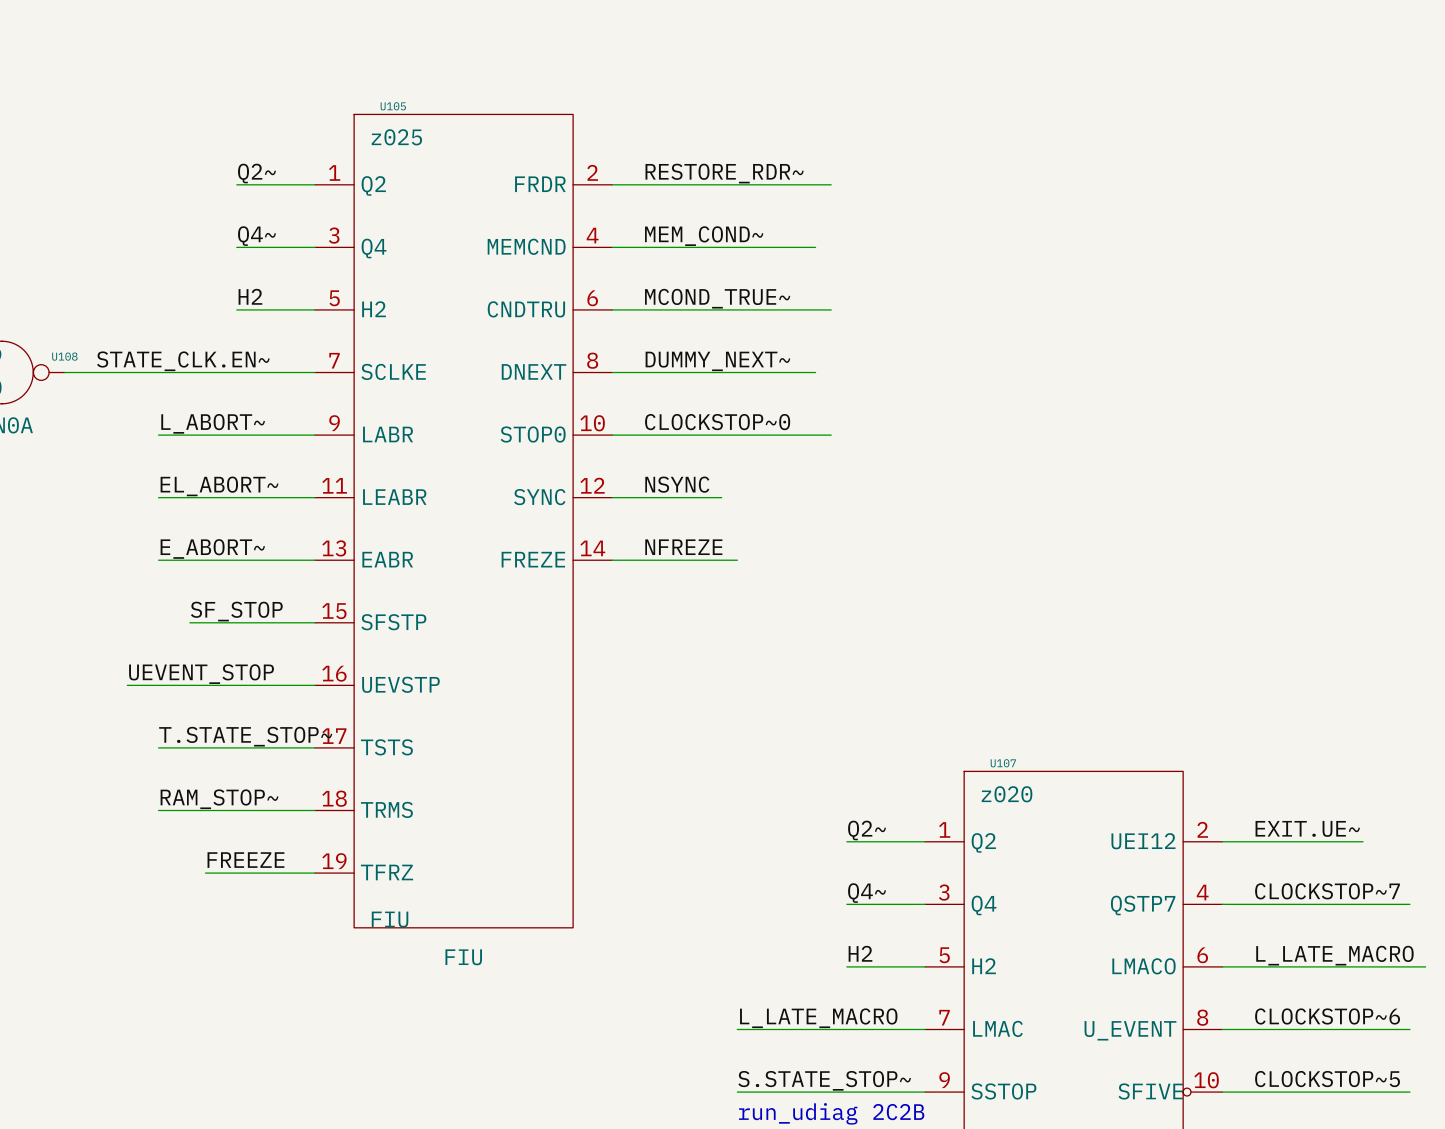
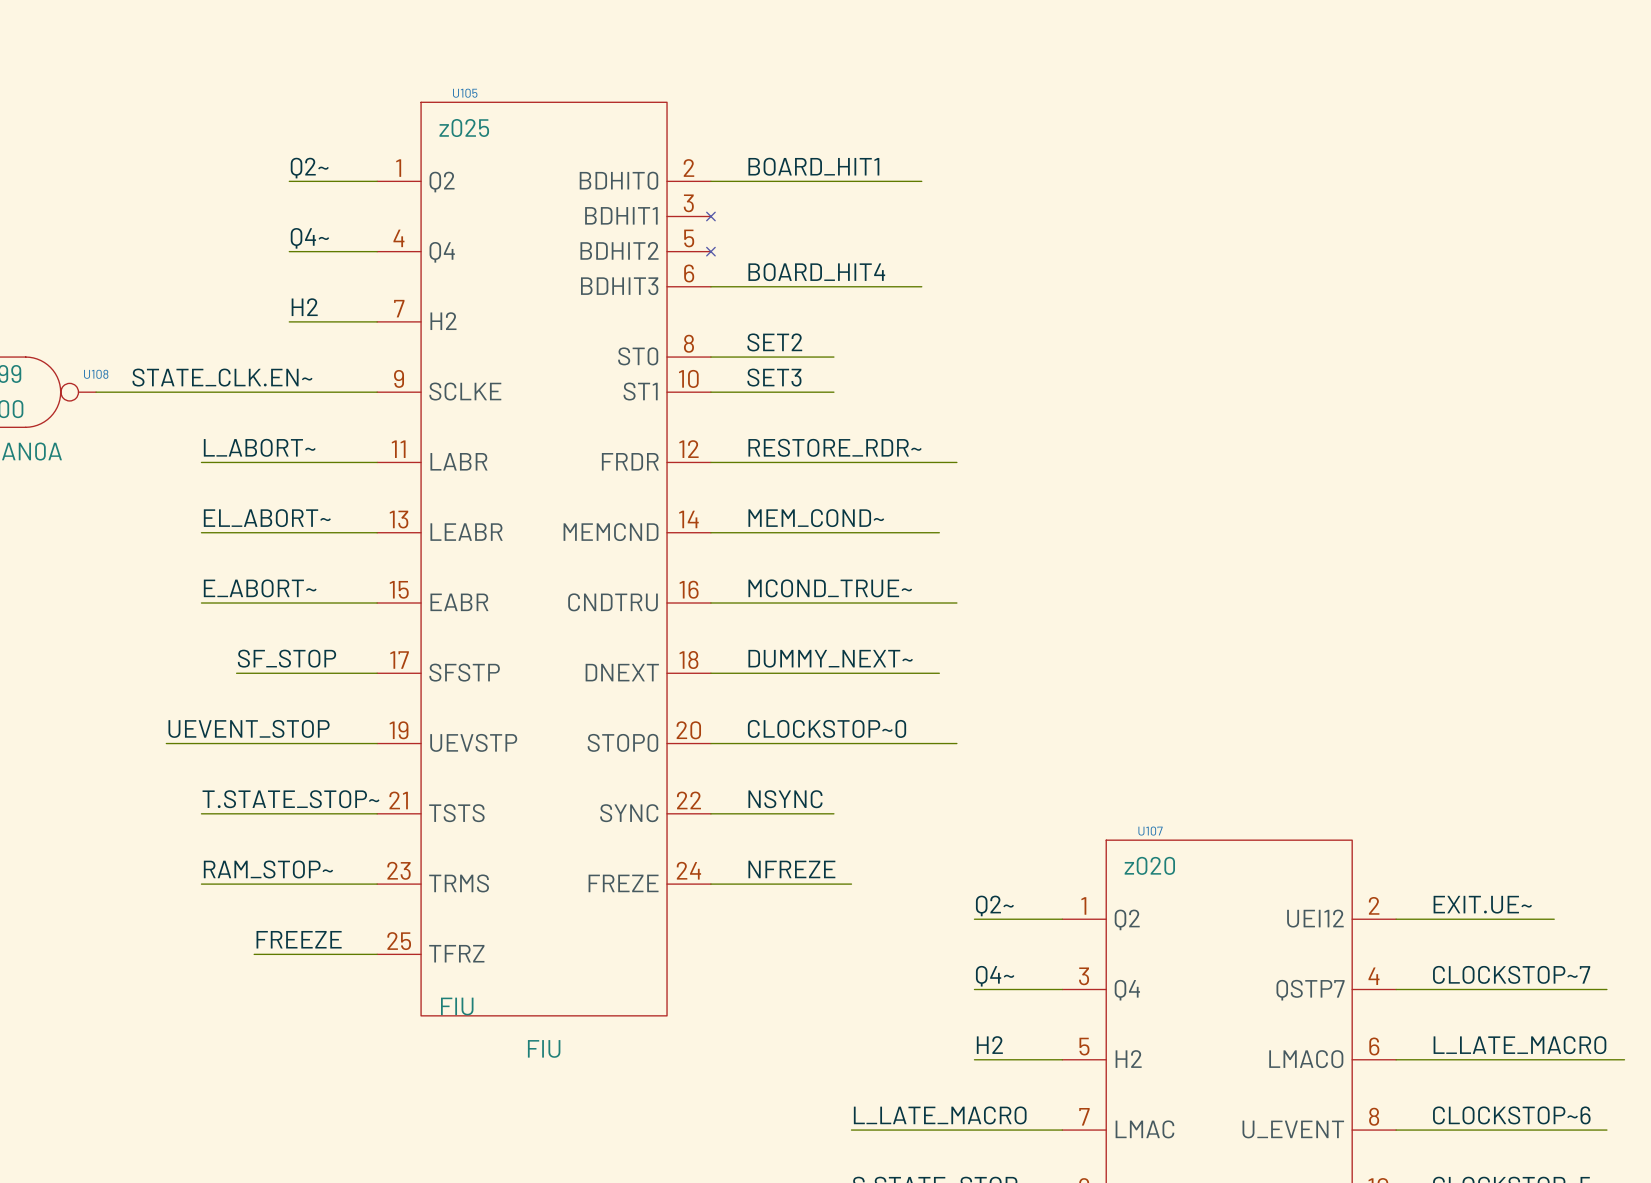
U105 symbol: [315, 114, 613, 928] -> [377, 102, 711, 1016]
label: RESTORE_RDR~ (724, 173) -> BOARD_HIT1 (813, 166)
wire: (799, 184) (831, 184) -> none
no-connect mark: none -> (710, 216)
label: MEM_COND~ (704, 236) -> none
wire: (612, 247) (815, 247) -> none
no-connect mark: none -> (710, 251)
label: none -> BOARD_HIT4 (816, 272)
wire: none -> (710, 286) (921, 286)
label: MCOND_TRUE~ (717, 298) -> none
wire: (612, 309) (831, 309) -> none
label: none -> SET2 (774, 342)
wire: none -> (710, 357) (833, 357)
label: DUMMY_NEXT~ (717, 361) -> SET3 (774, 377)
wire: (721, 372) (815, 372) -> (833, 532) (939, 532)
label: CLOCKSTOP~0 (717, 422) -> RESTORE_RDR~ (835, 447)
label: NSYNC (677, 484) -> MEM_COND~ (816, 518)
label: NFREZE (683, 547) -> MCOND_TRUE~ (830, 588)
wire: none -> (851, 603) (956, 603)
label: none -> DUMMY_NEXT~ (830, 658)
wire: none -> (710, 673) (939, 673)
label: none -> CLOCKSTOP~0 (827, 728)
wire: none -> (710, 743) (956, 743)
label: none -> NSYNC (785, 799)
wire: none -> (710, 813) (833, 813)
label: none -> NFREZE (791, 869)
wire: none -> (710, 884) (851, 884)

